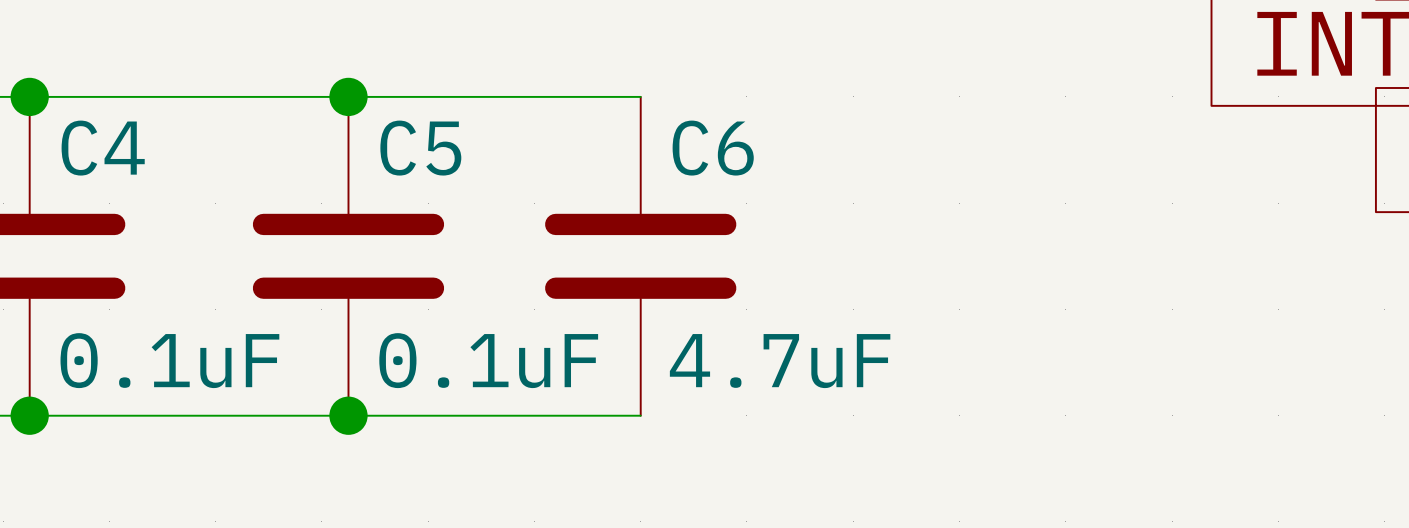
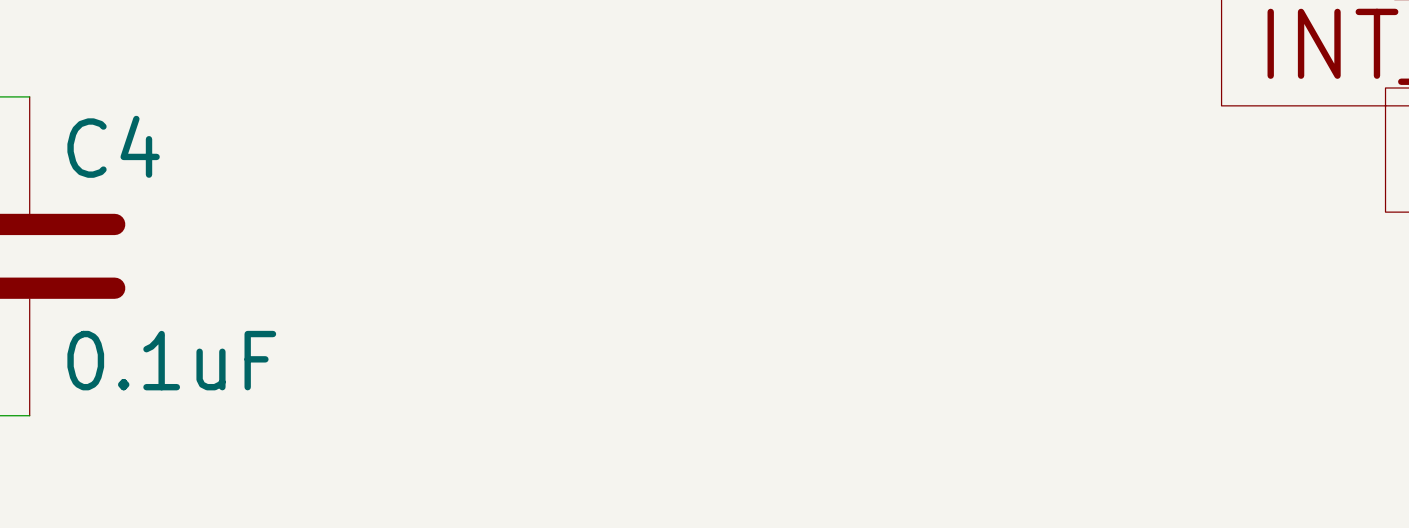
wire: (29, 96) (640, 96) -> none
junction: (29, 96) -> none
junction: (348, 96) -> none
C5: 0.1uF (348, 256) -> none
C6: 4.7uF (640, 256) -> none
wire: (29, 415) (640, 415) -> none
junction: (29, 415) -> none
junction: (348, 415) -> none

